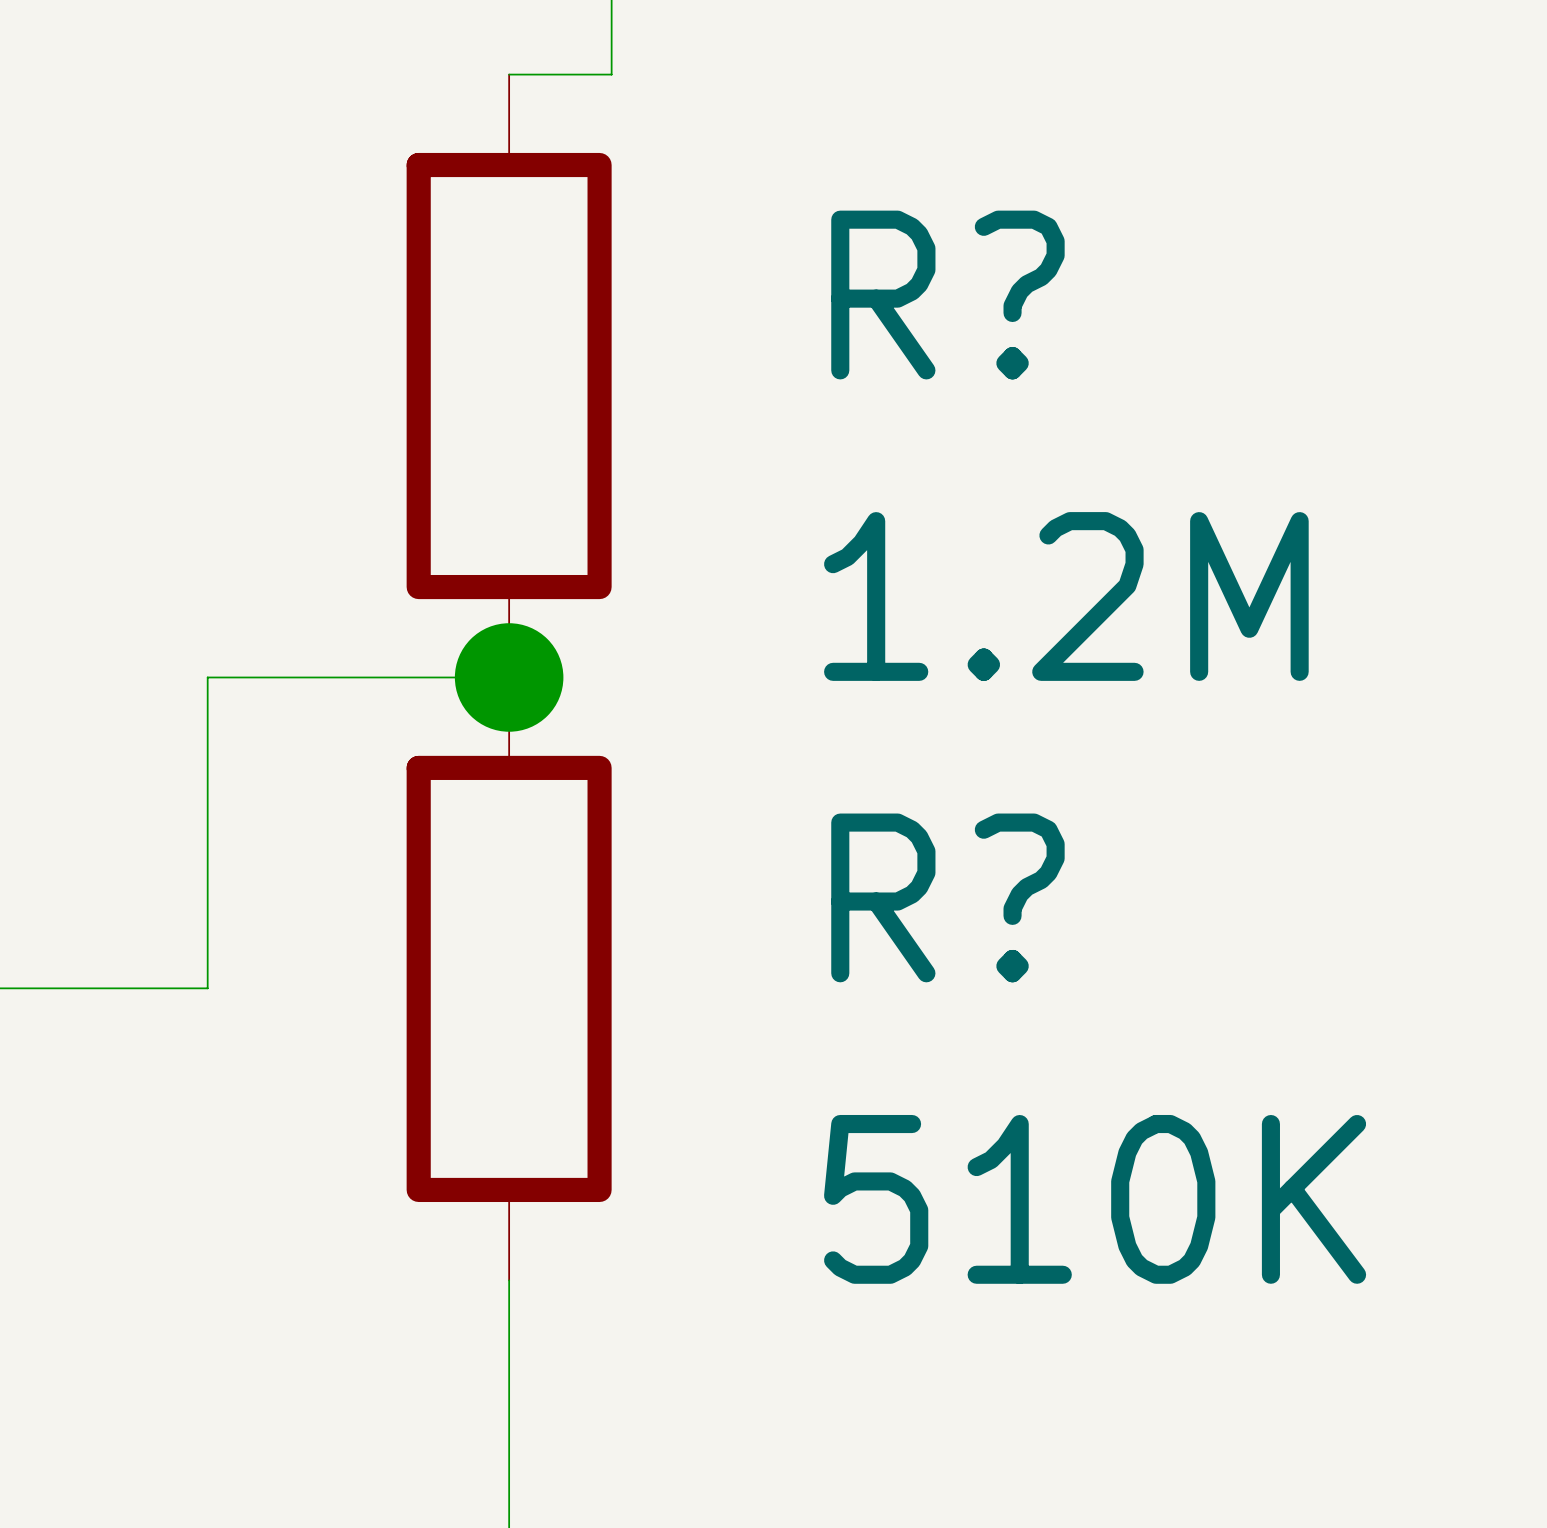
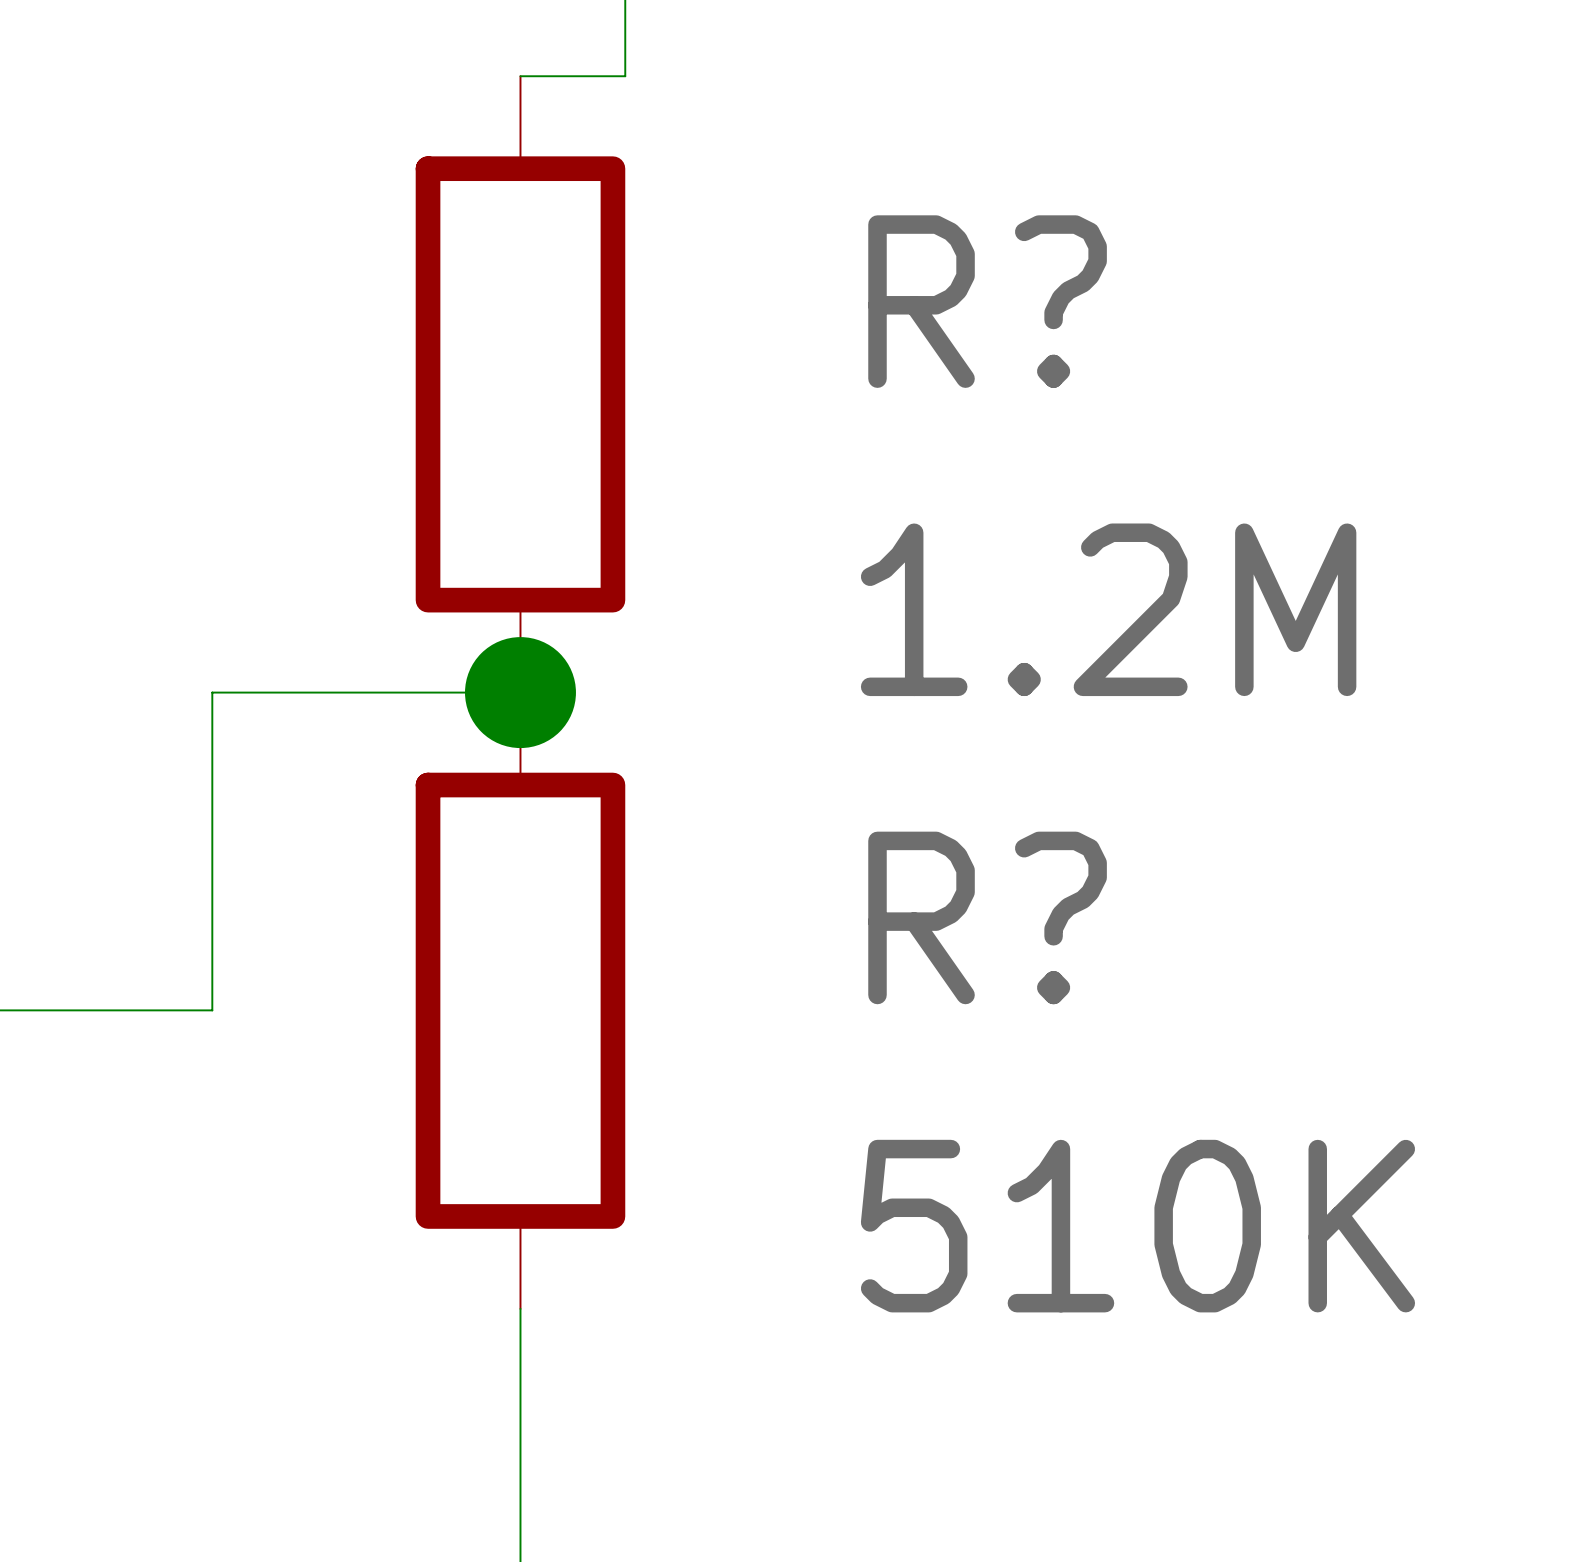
R? name position: R? (947, 295) -> R? (987, 301)
R? value position: 1.2M (1066, 596) -> 1.2M (1108, 609)
R? name position: R? (947, 897) -> R? (987, 917)
R? value position: 510K (1095, 1199) -> 510K (1137, 1226)

